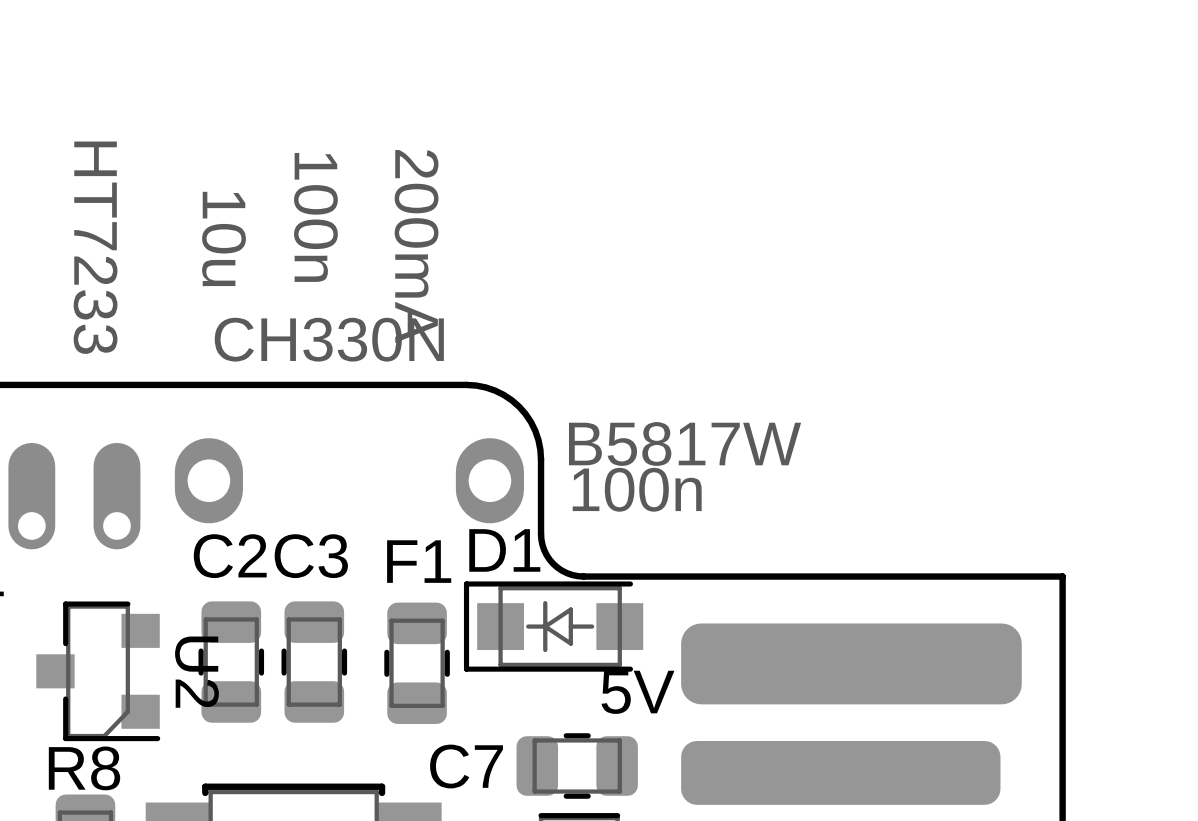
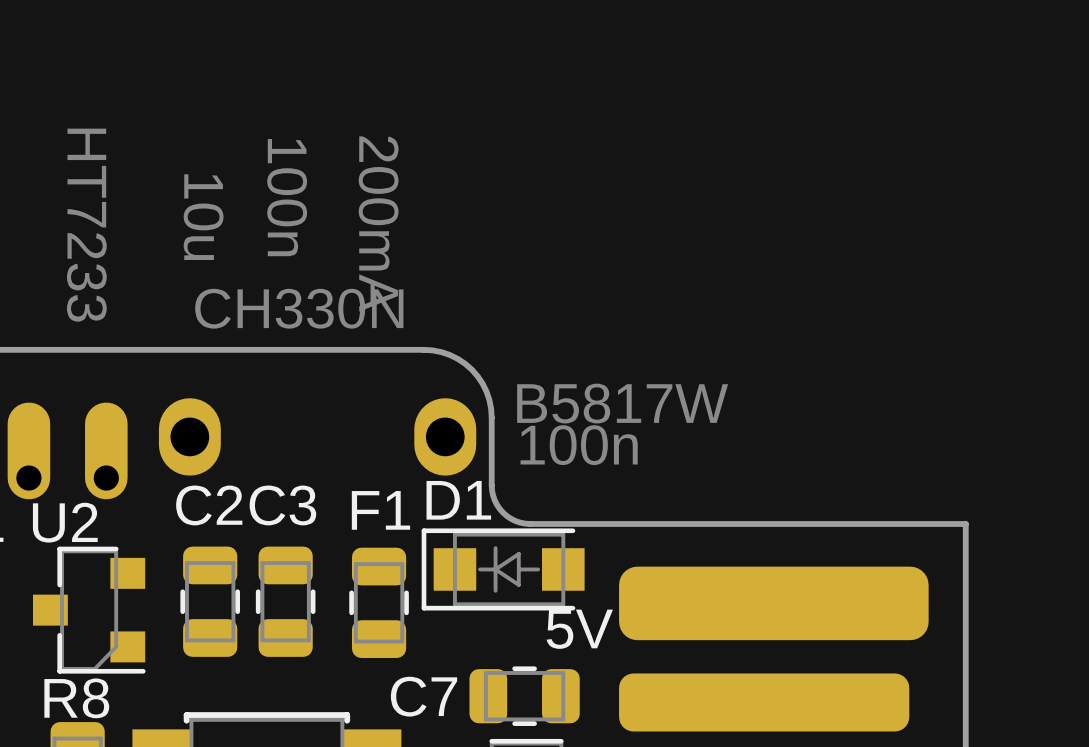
U2 name rotation: 0° (196, 672) -> 90° counterclockwise (65, 522)
U2 name position: U2 (196, 672) -> U2 (65, 522)

